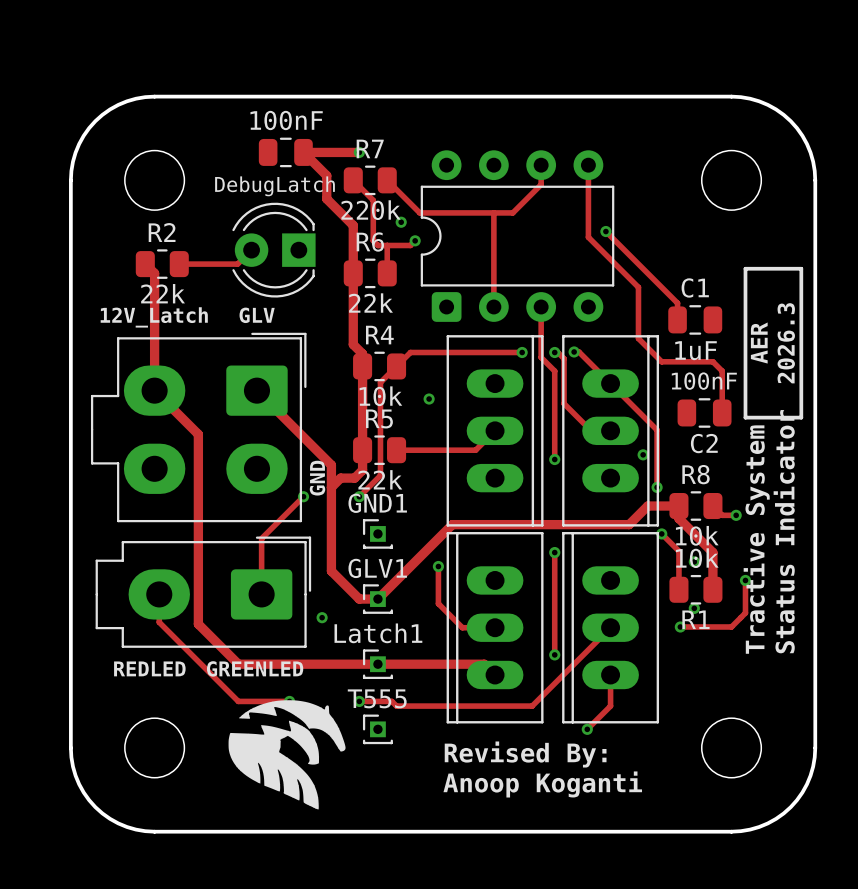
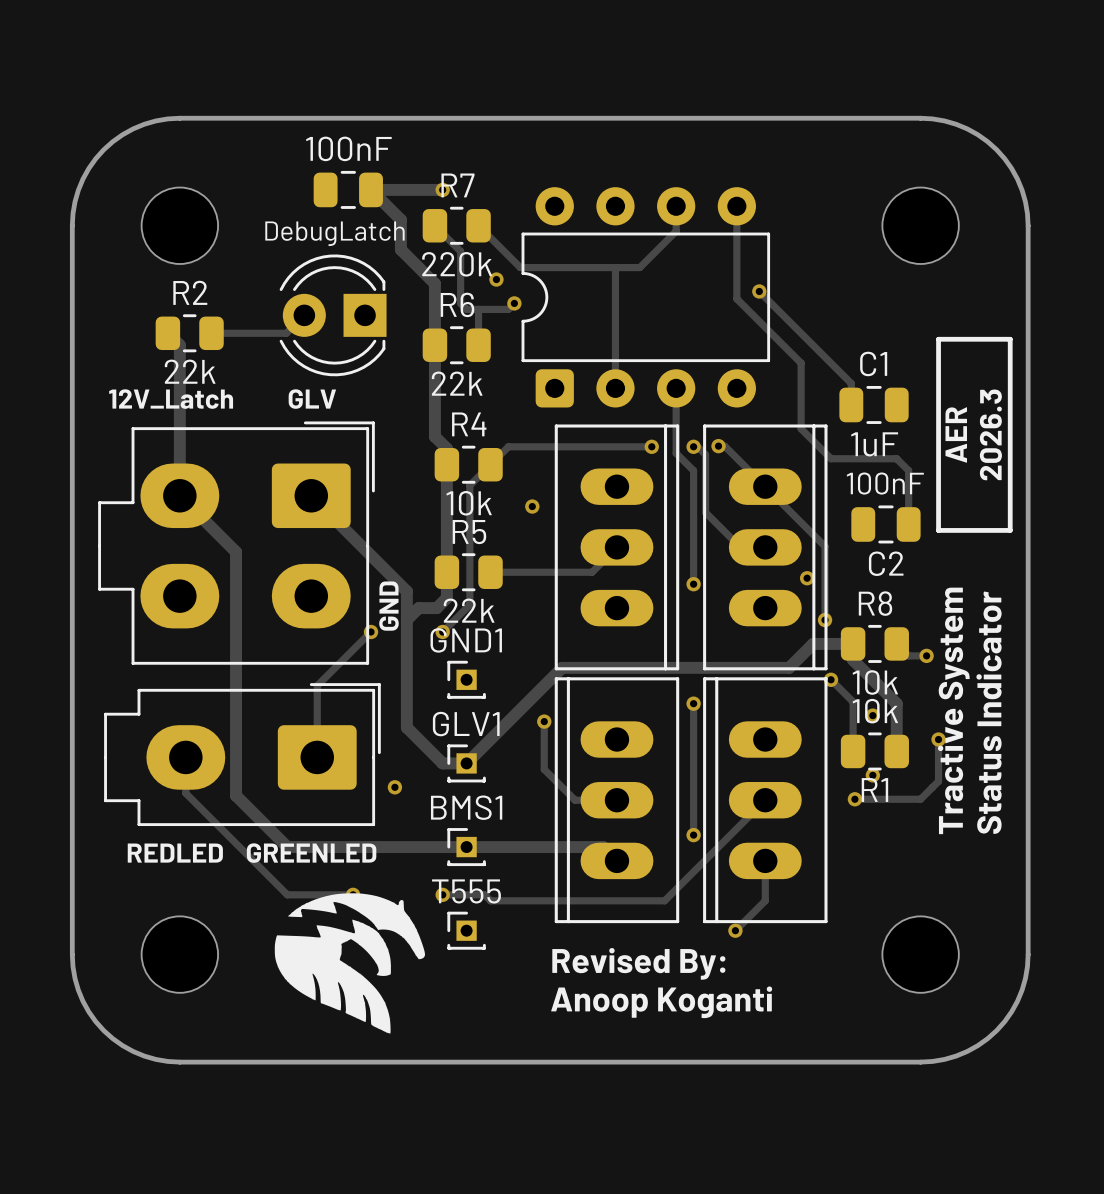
Latch1 name: Latch1 (378, 633) -> BMS1 (466, 807)

